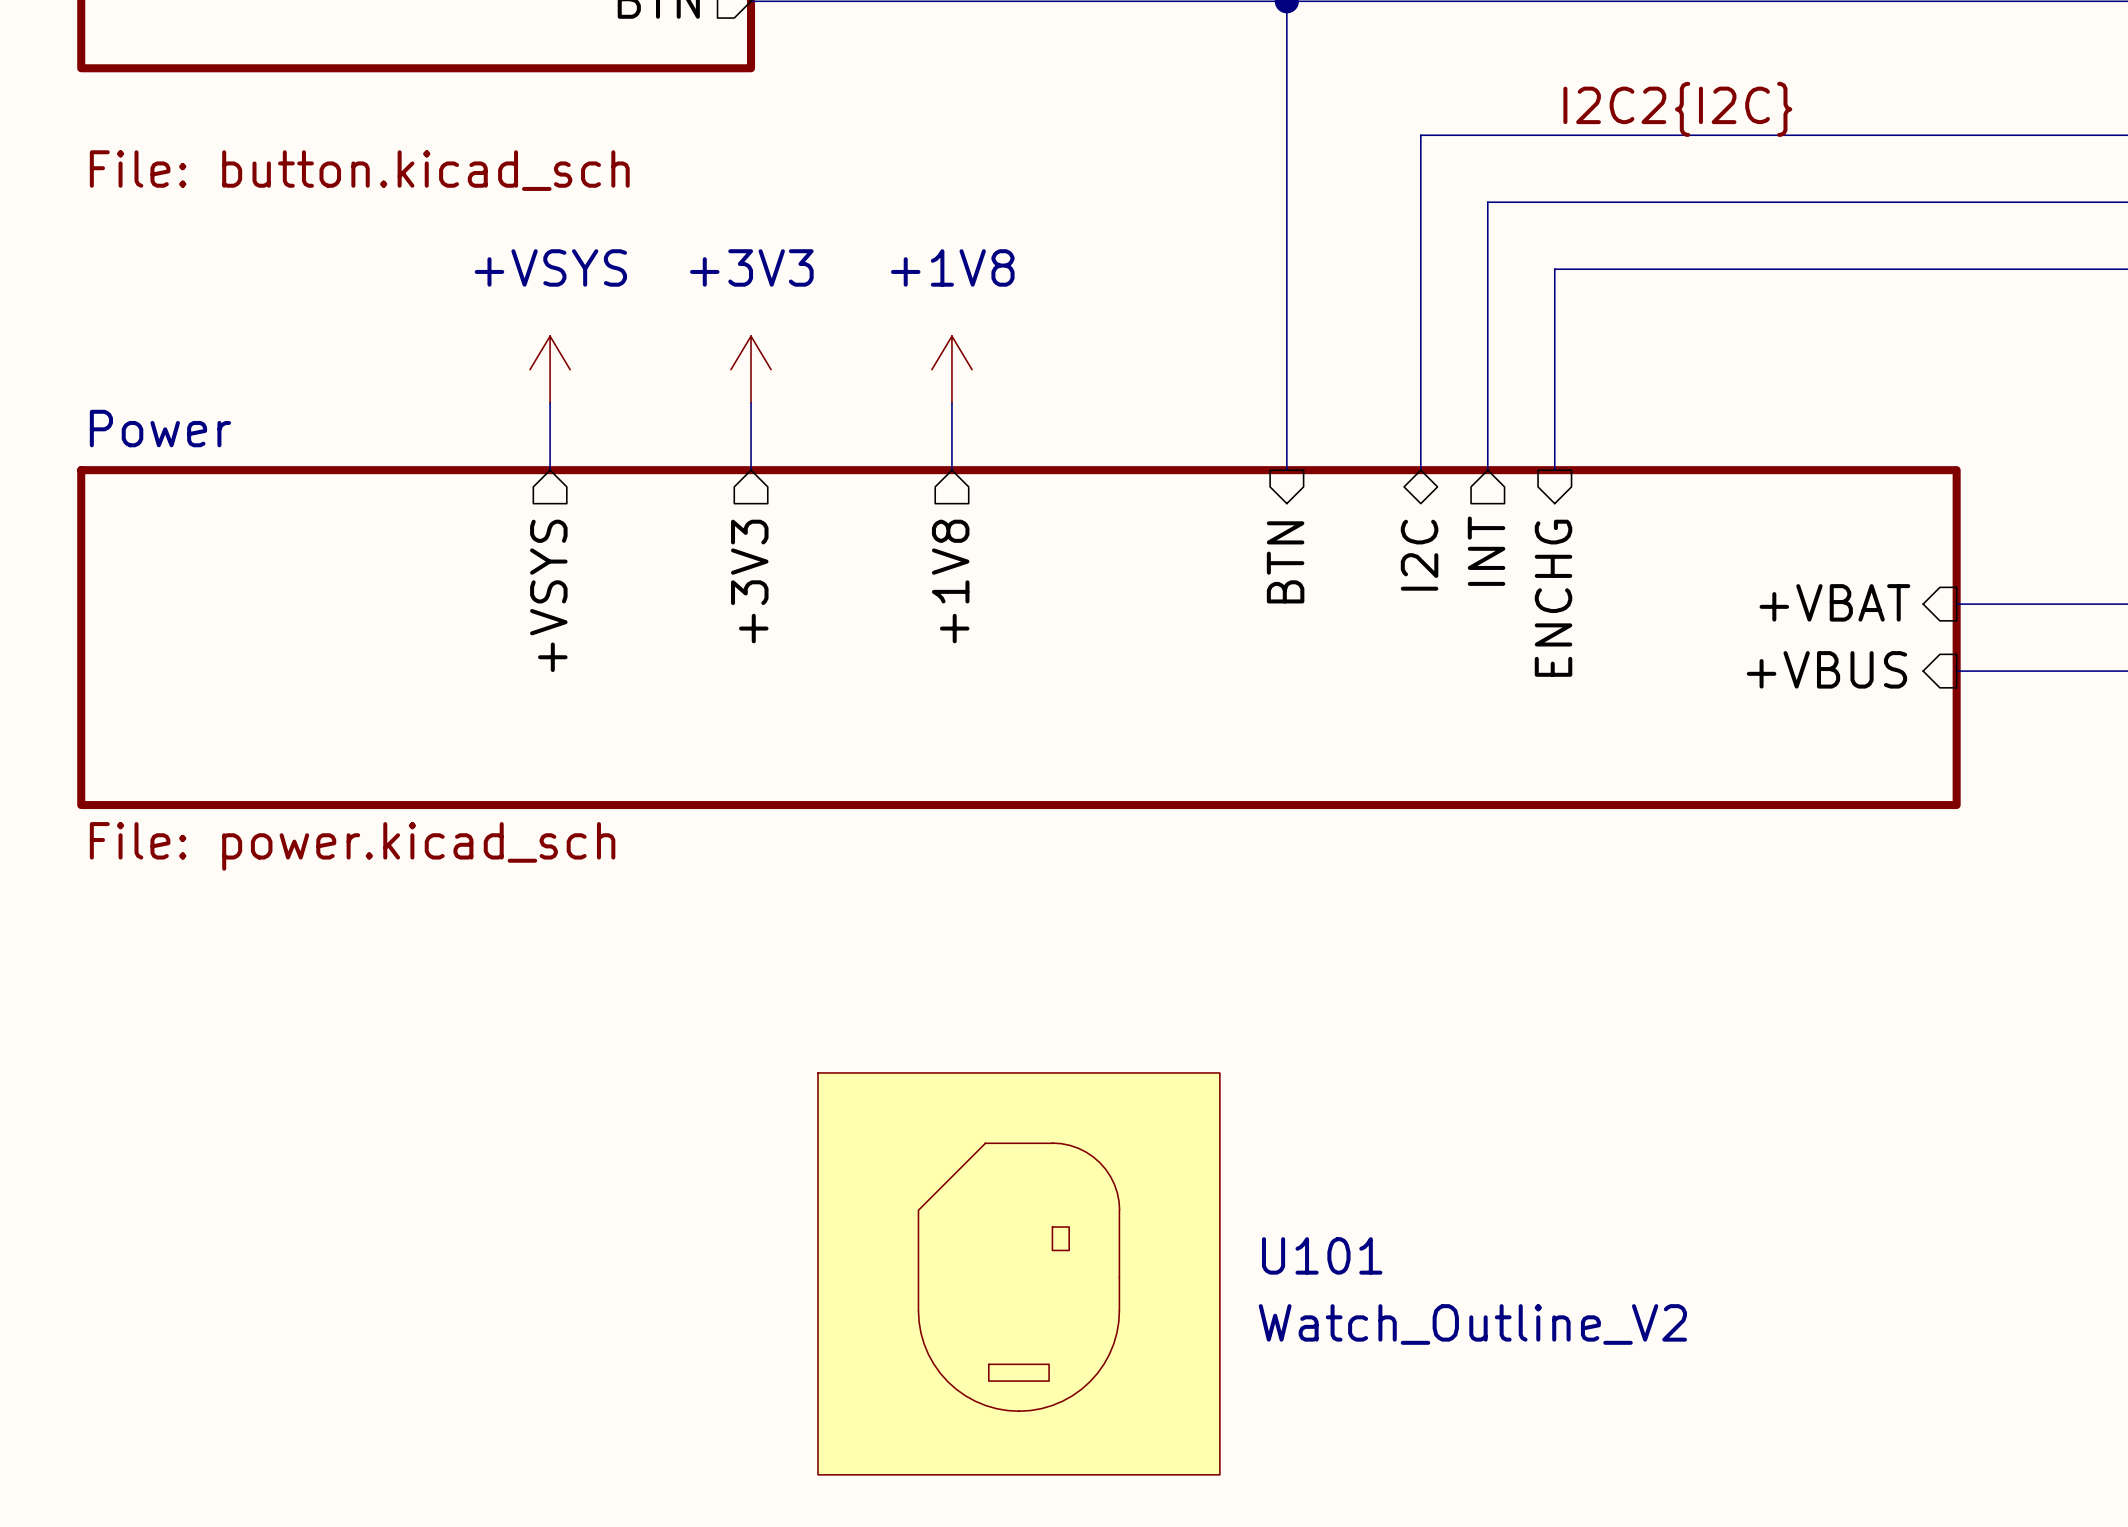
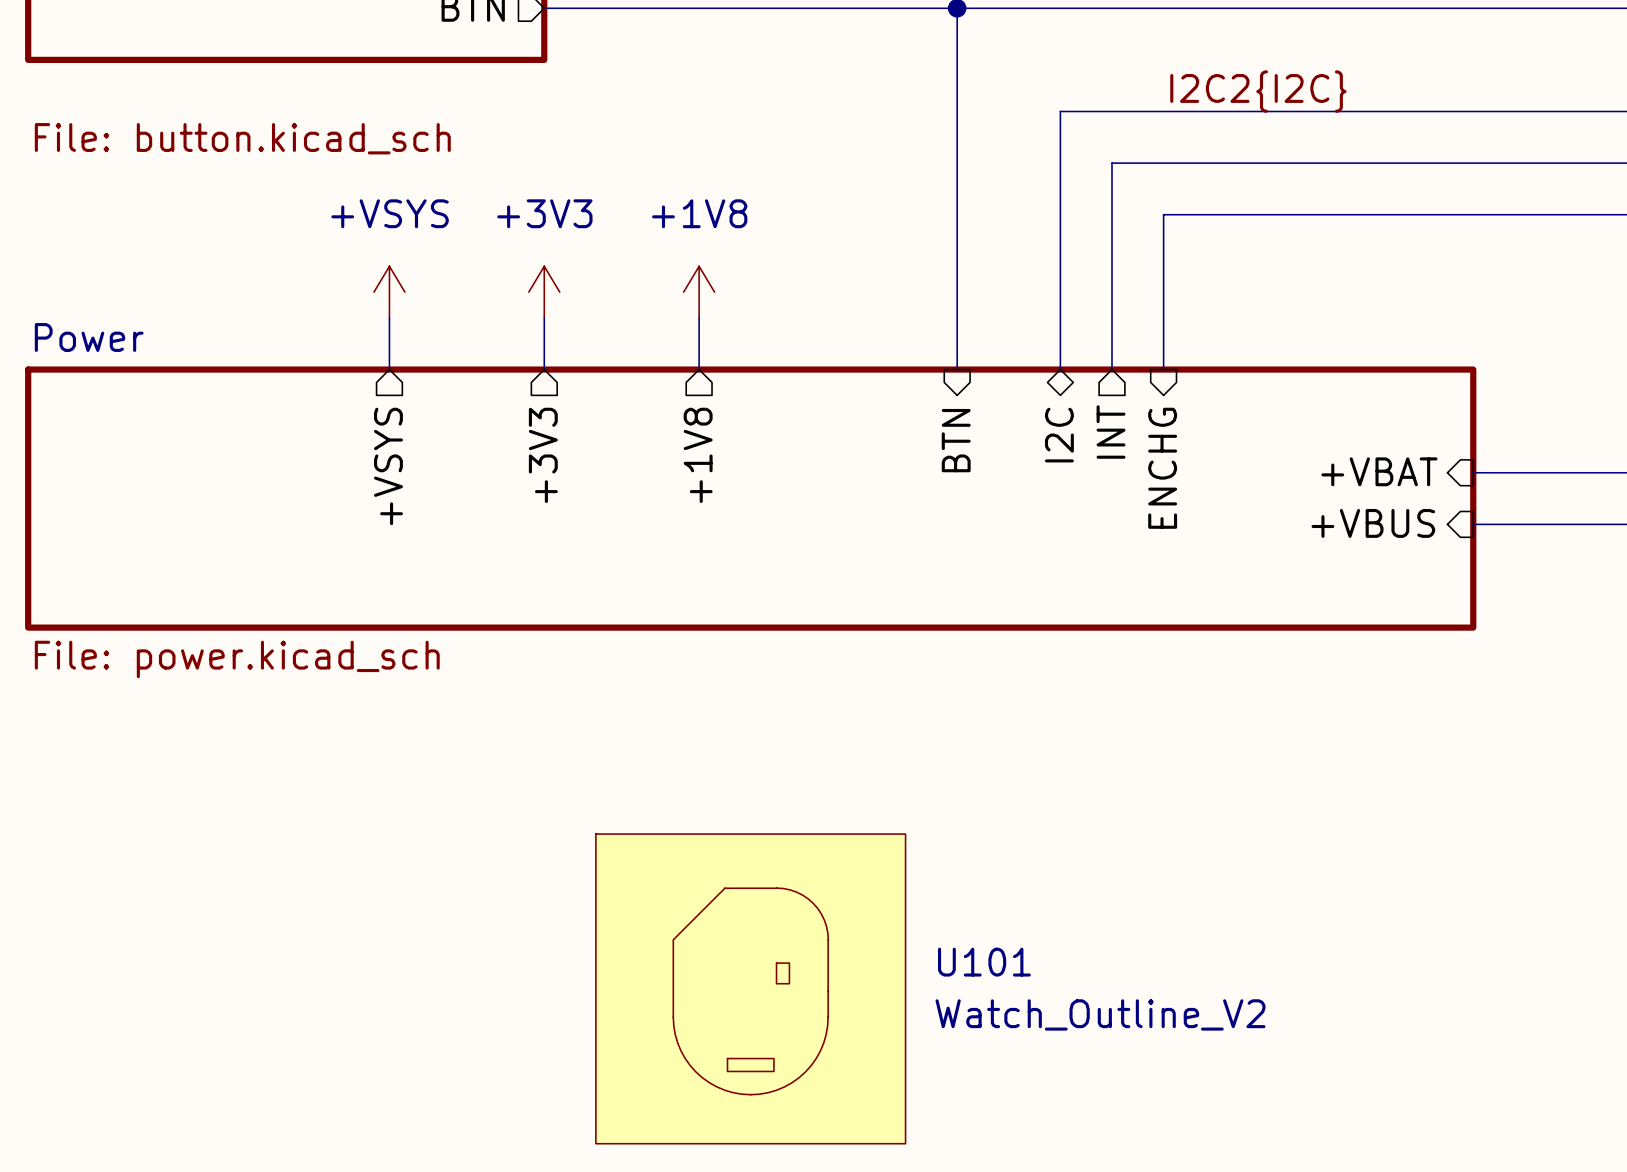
U101 symbol: [818, 1072, 1220, 1475] -> [595, 834, 906, 1144]
U101 name position: U101 (1322, 1255) -> U101 (984, 962)
U101 value position: Watch_Outline_V2 (1472, 1324) -> Watch_Outline_V2 (1100, 1014)

